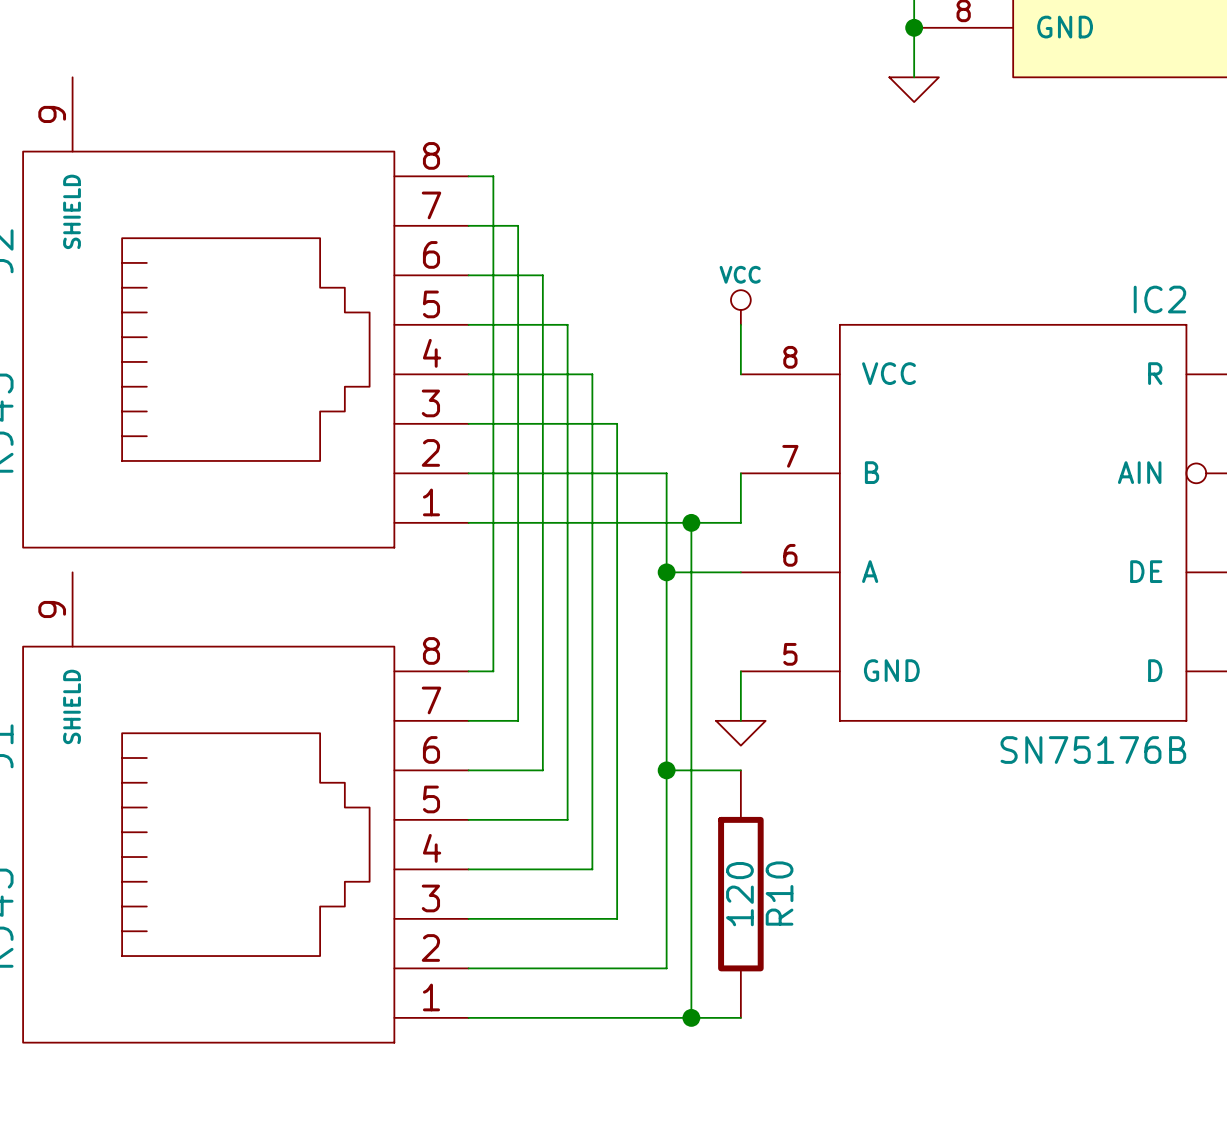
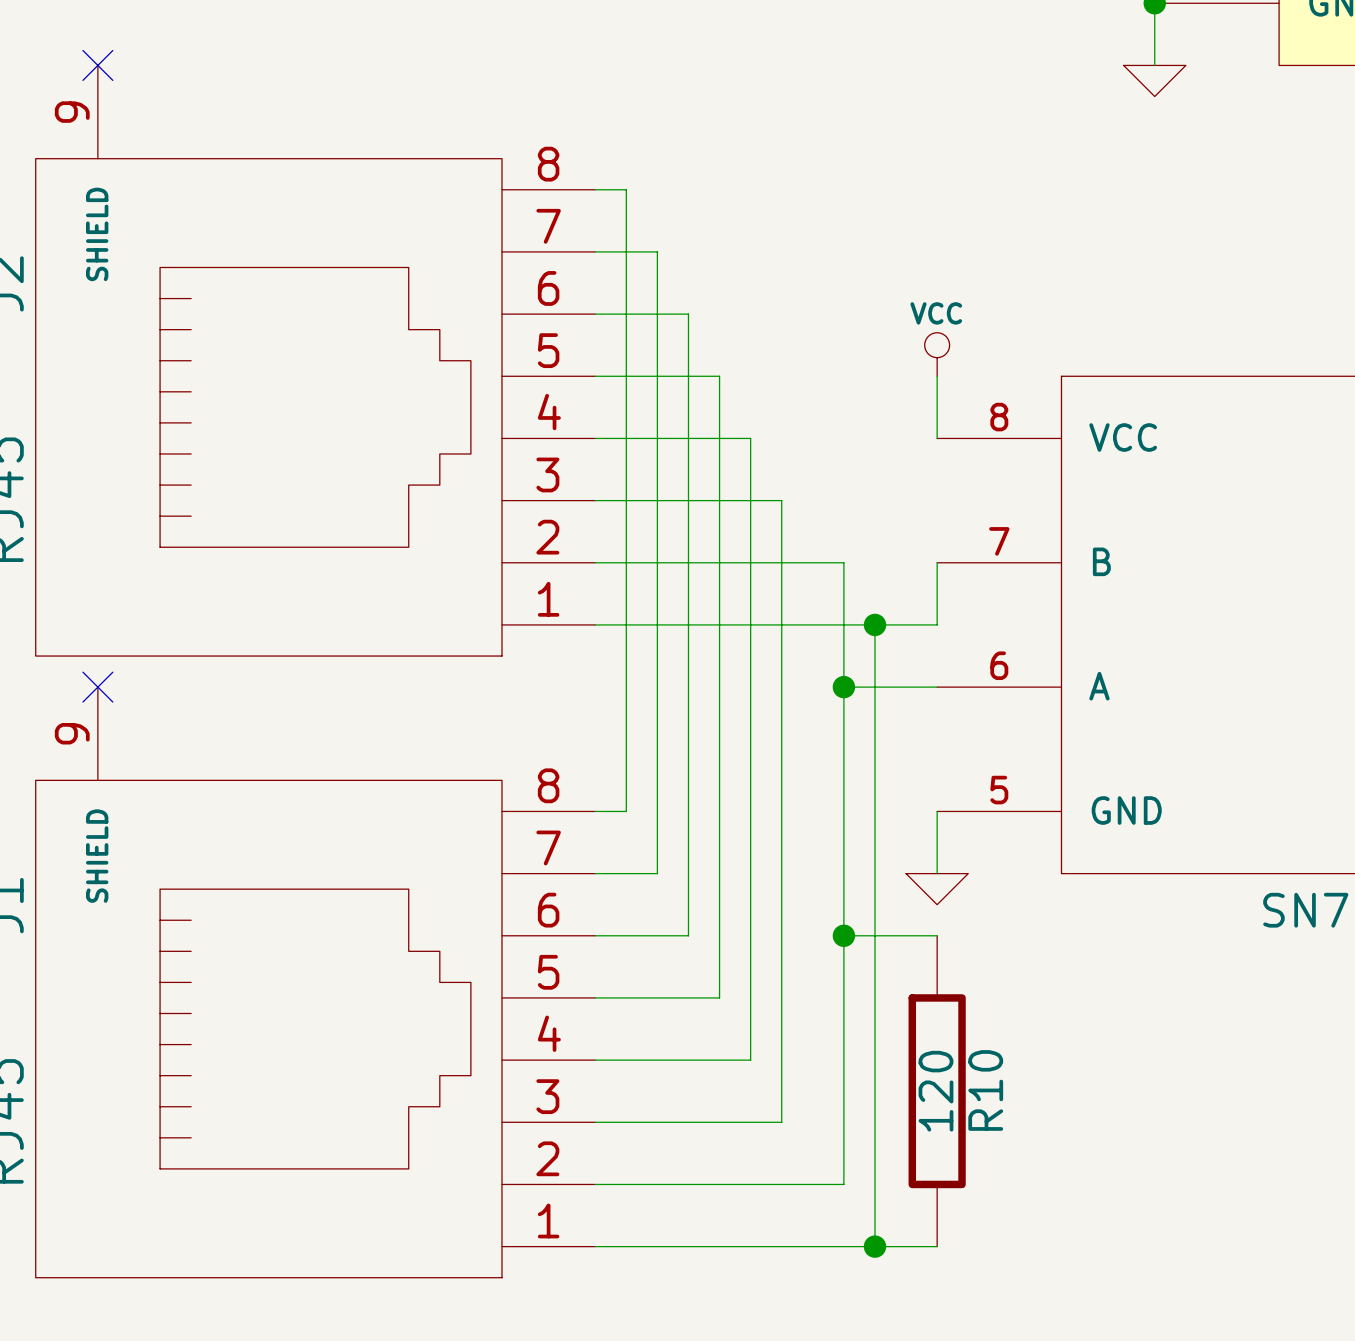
no-connect mark: none -> (97, 65)
no-connect mark: none -> (97, 687)

